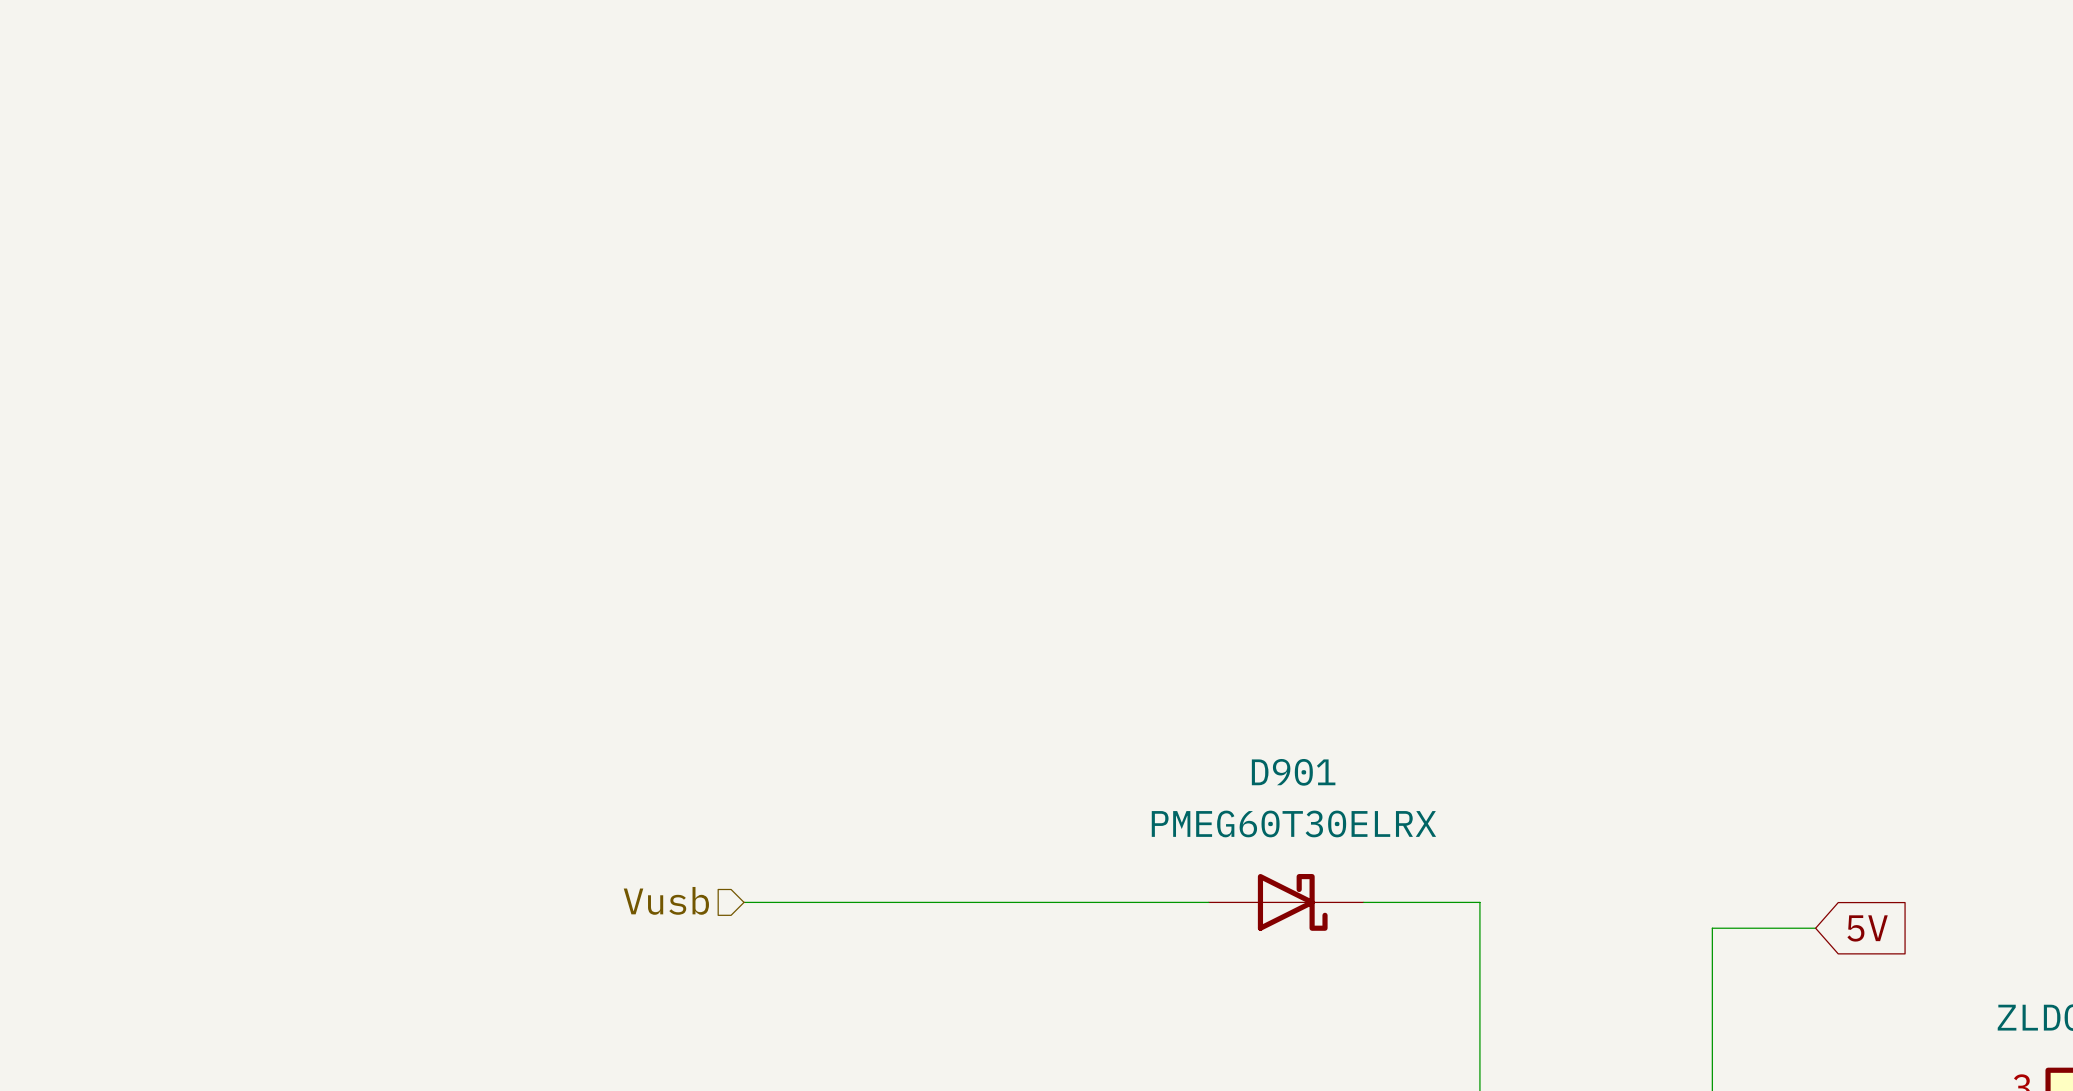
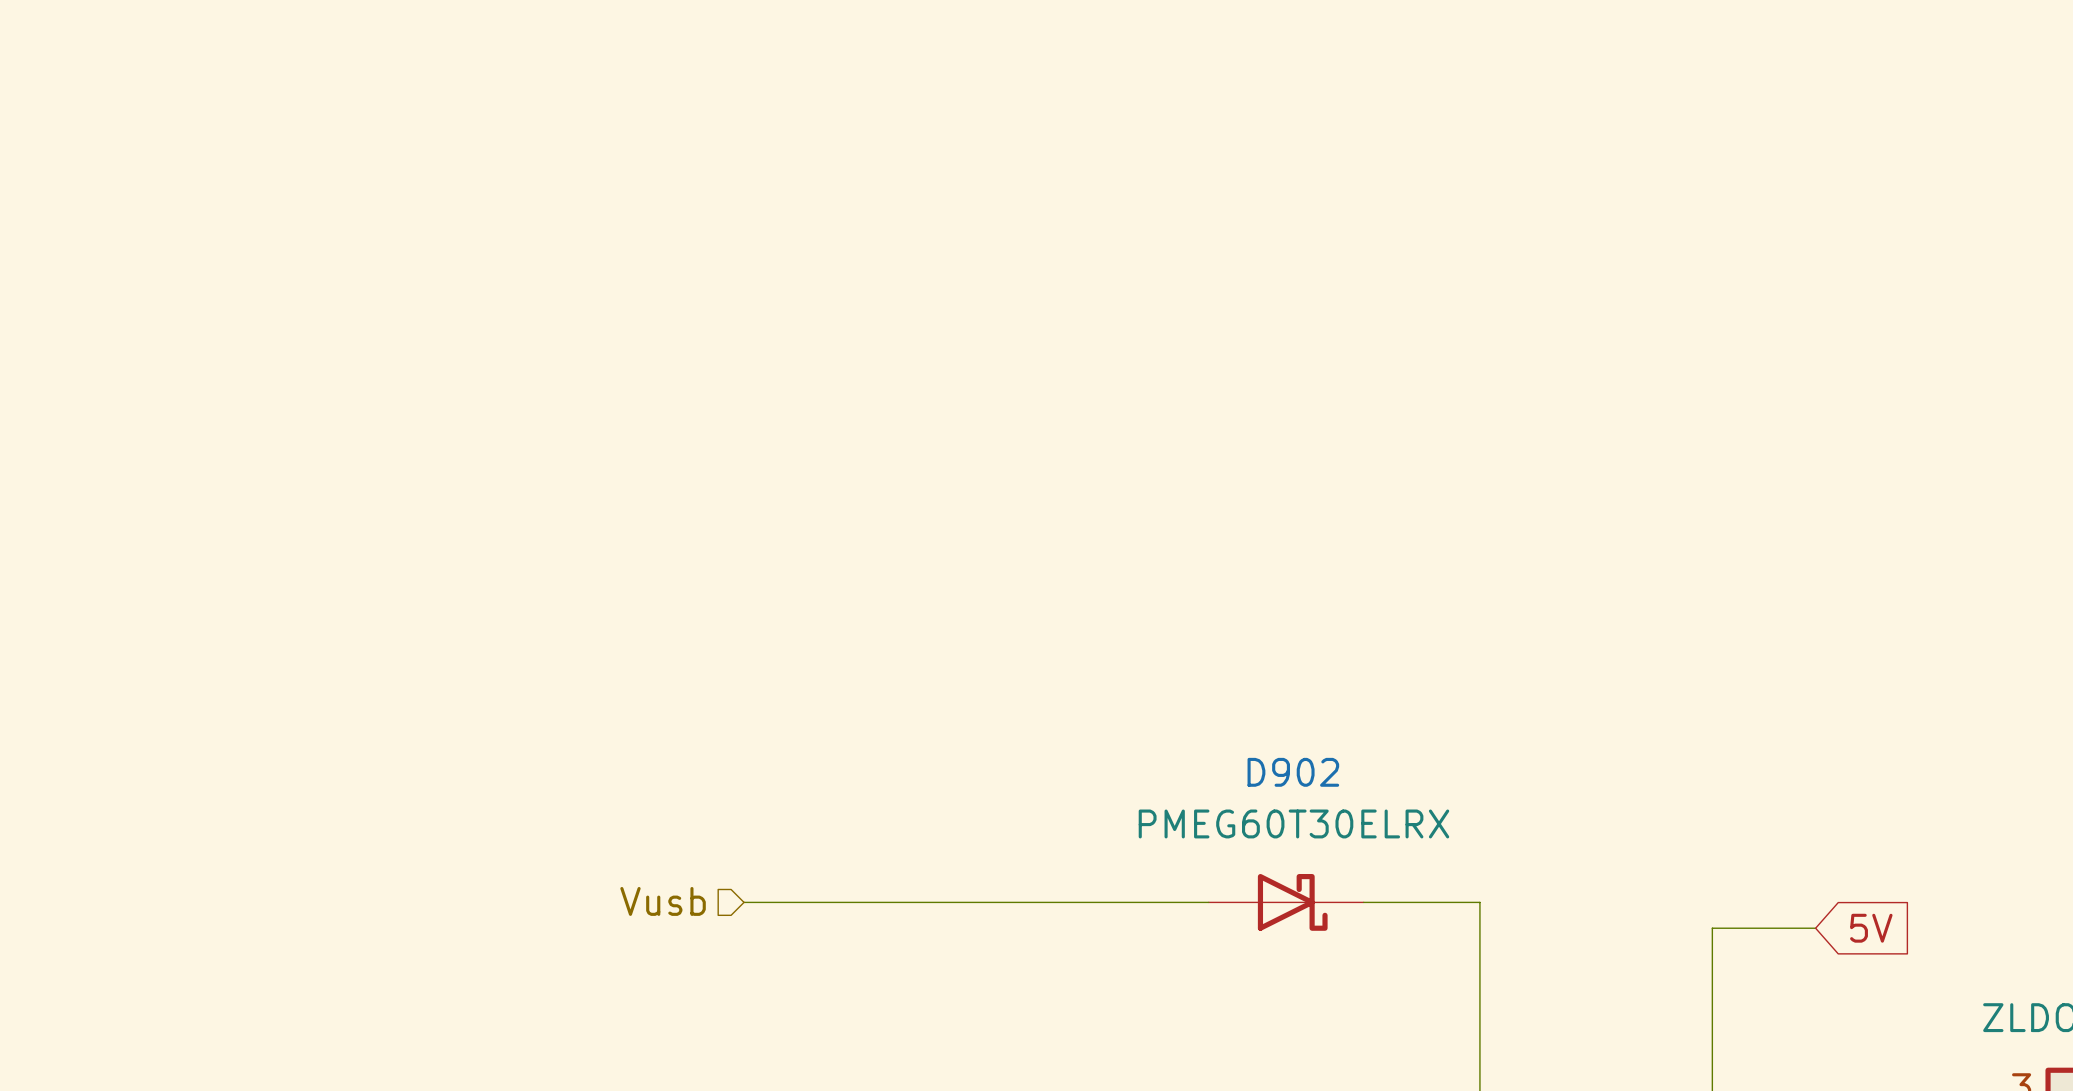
D901 name: D901 (1293, 772) -> D902 (1293, 772)

